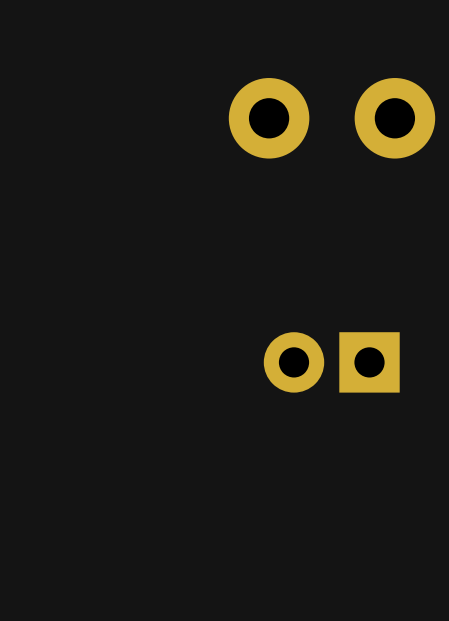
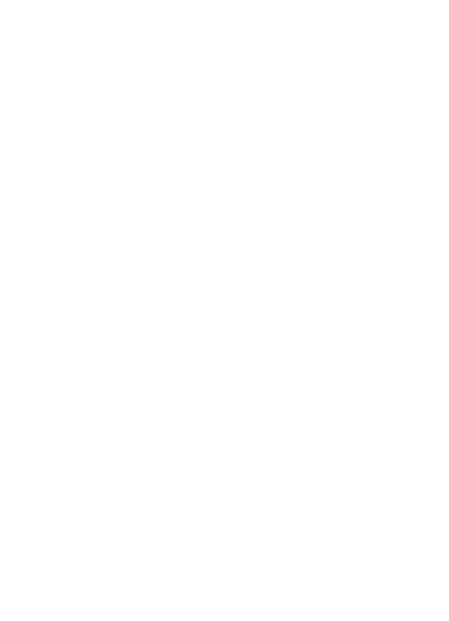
part: (331, 118) -> none
part: (331, 362) -> none

